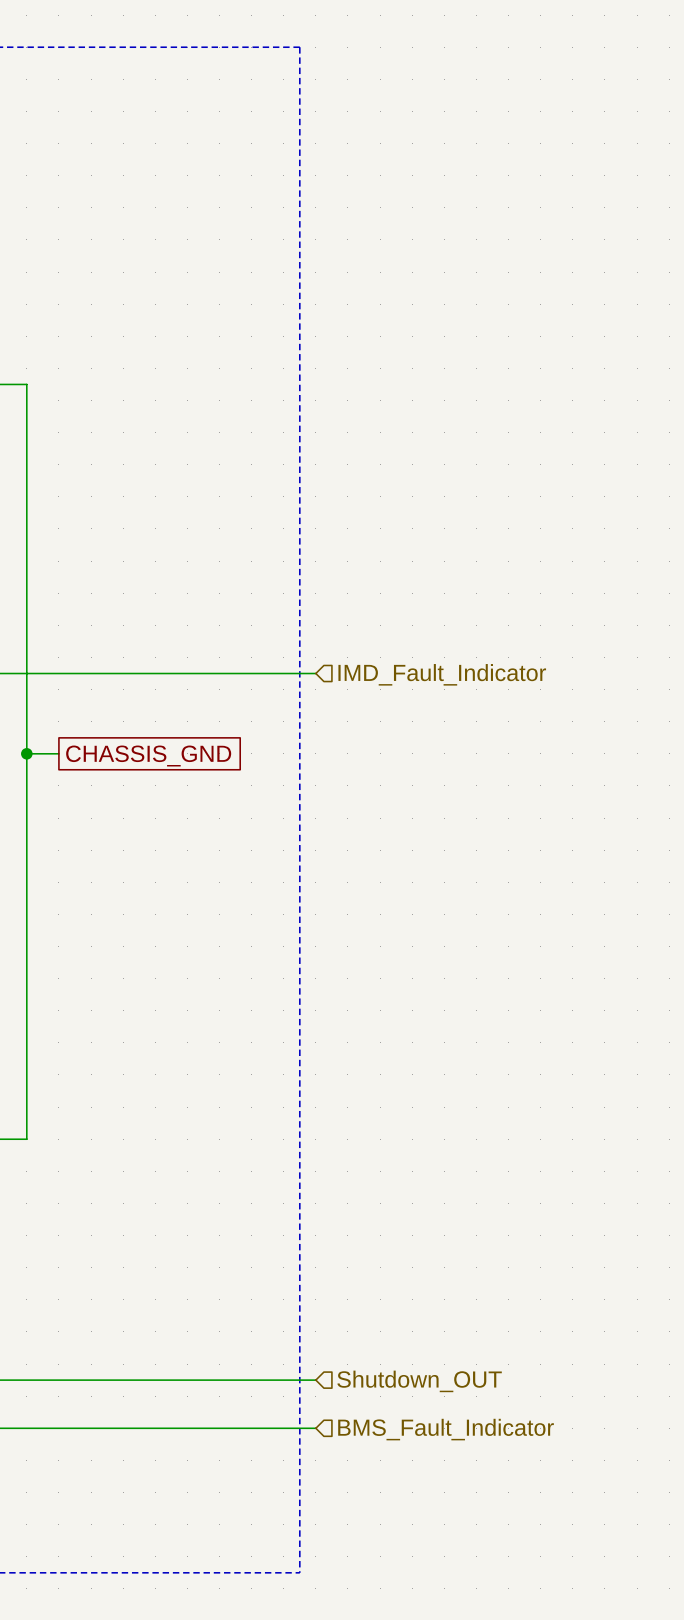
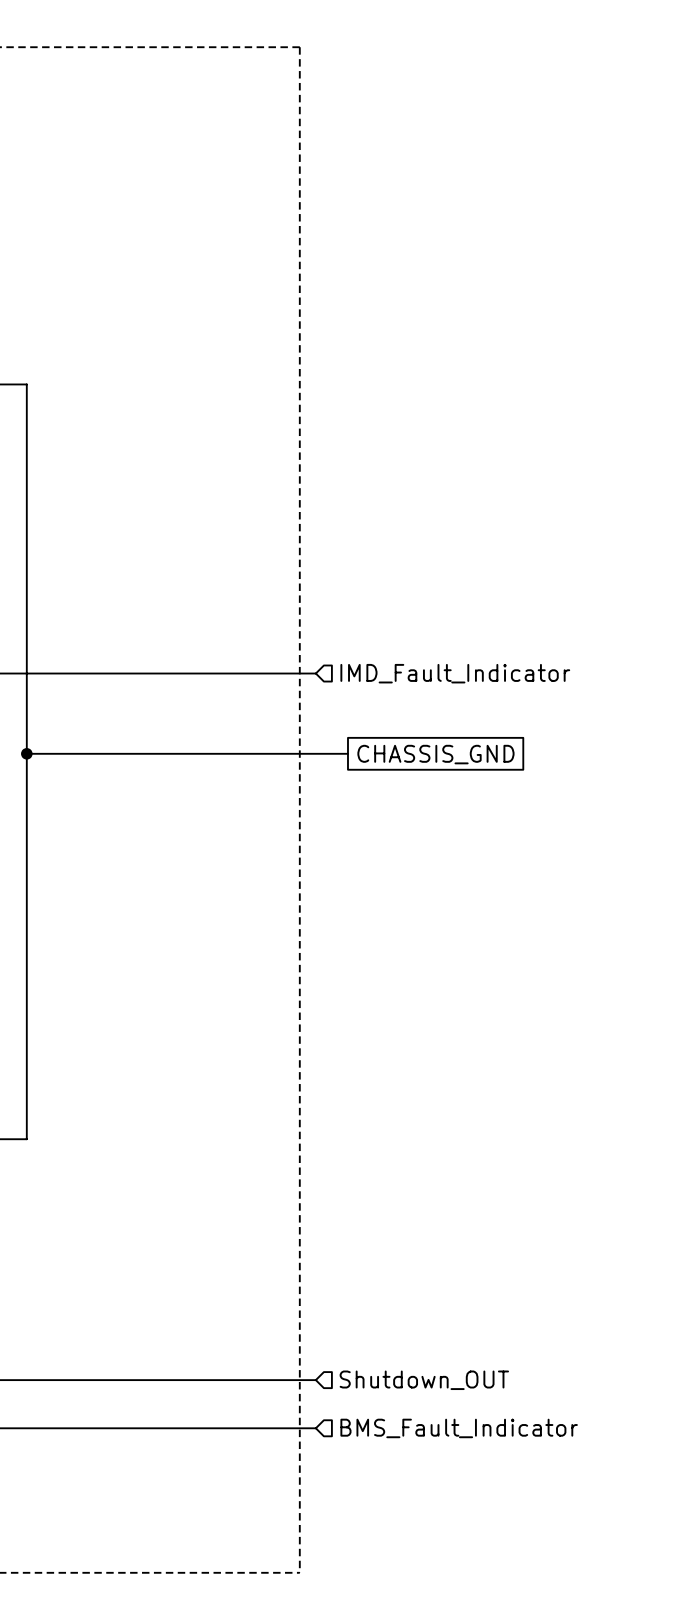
wire: none -> (58, 753) (347, 753)
global label position: CHASSIS_GND (148, 756) -> CHASSIS_GND (435, 754)

